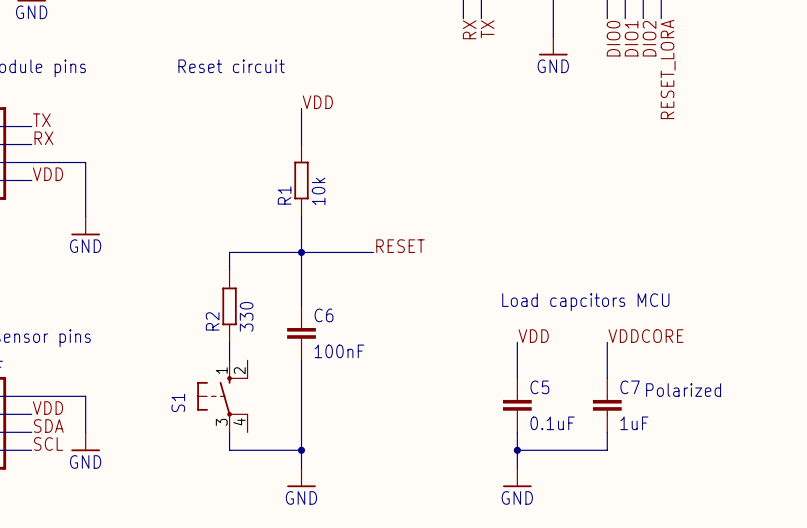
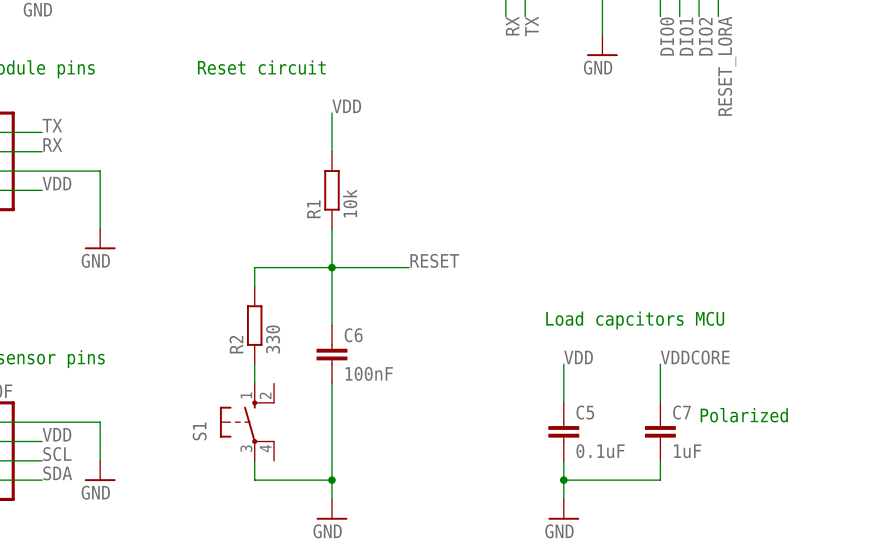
label: SDA (48, 426) -> SCL (57, 454)
label: SCL (48, 444) -> SDA (57, 473)

